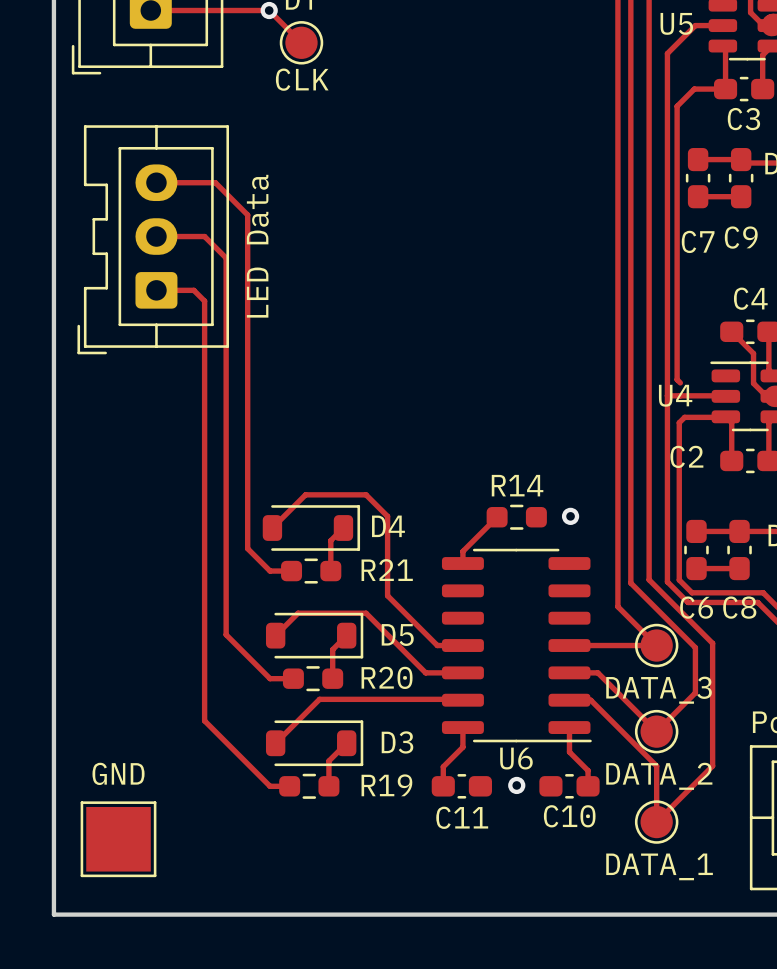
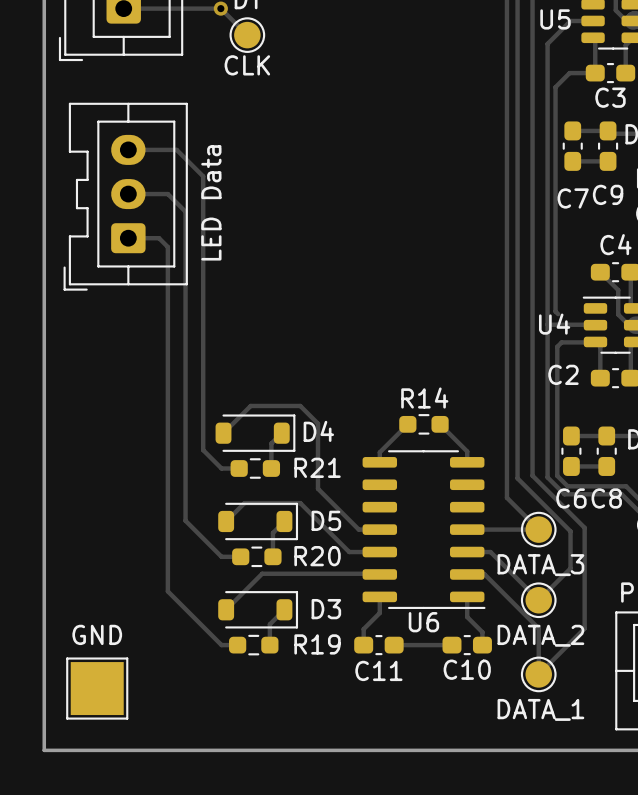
via: (570, 516) -> none
track: none -> (440, 424) (467, 451) (467, 462)
via: (516, 785) -> none
track: none -> (394, 645) (451, 645)

